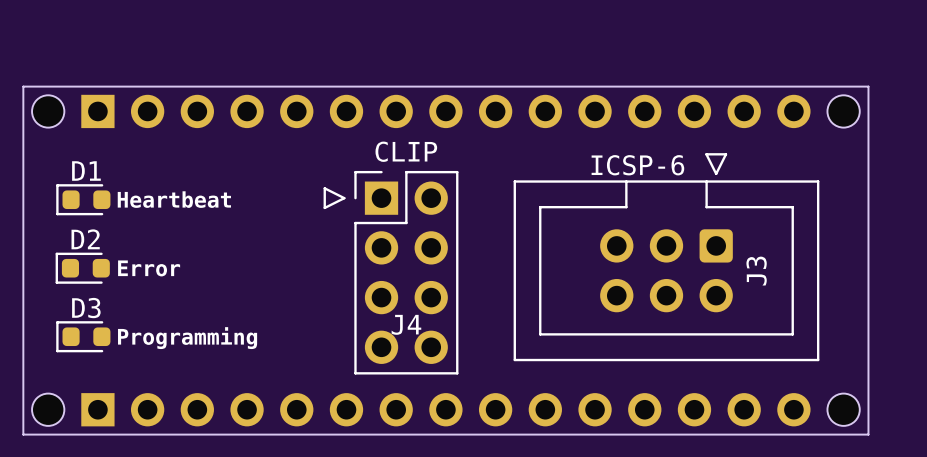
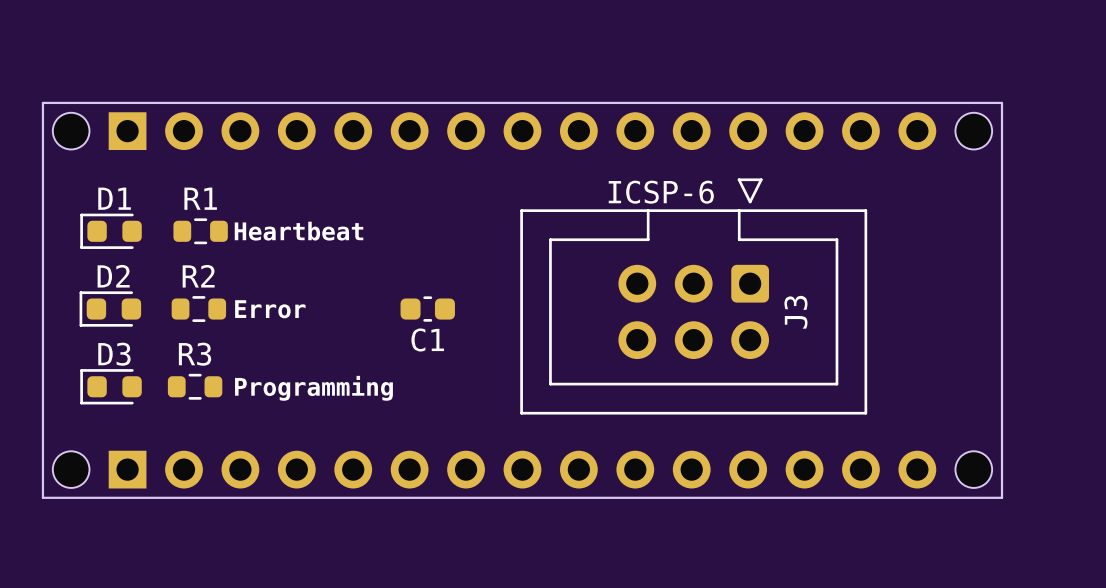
R1: none -> (200, 231)
text position: Heartbeat (174, 199) -> Heartbeat (299, 231)
J3 position: (666, 257) -> (693, 296)
text position: Error (149, 268) -> Error (270, 309)
R2: none -> (198, 309)
C1: none -> (427, 309)
J4: (391, 272) -> none
R3: none -> (195, 386)
text position: Programming (187, 338) -> Programming (313, 388)

